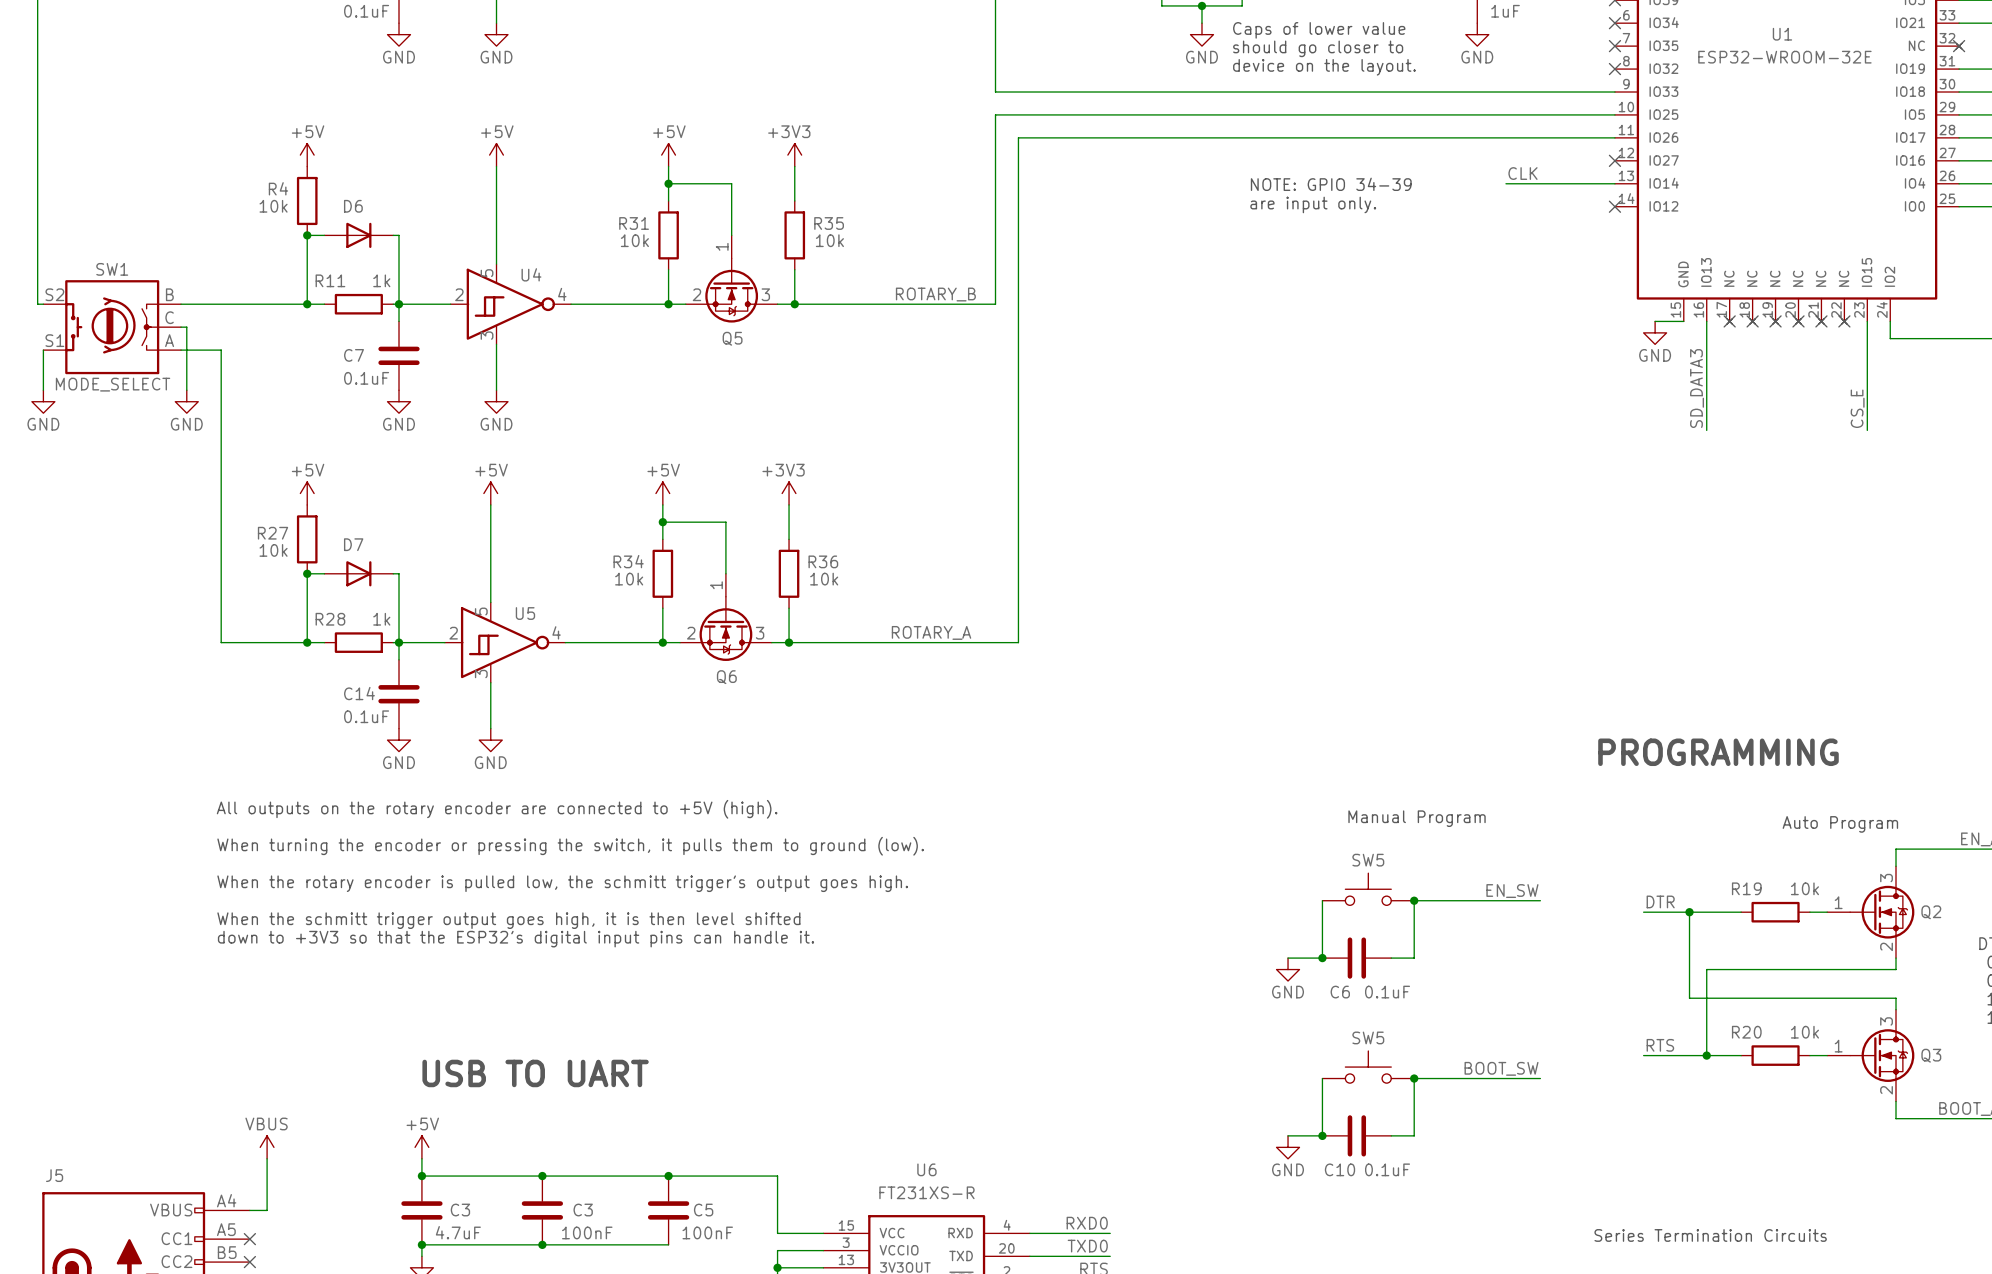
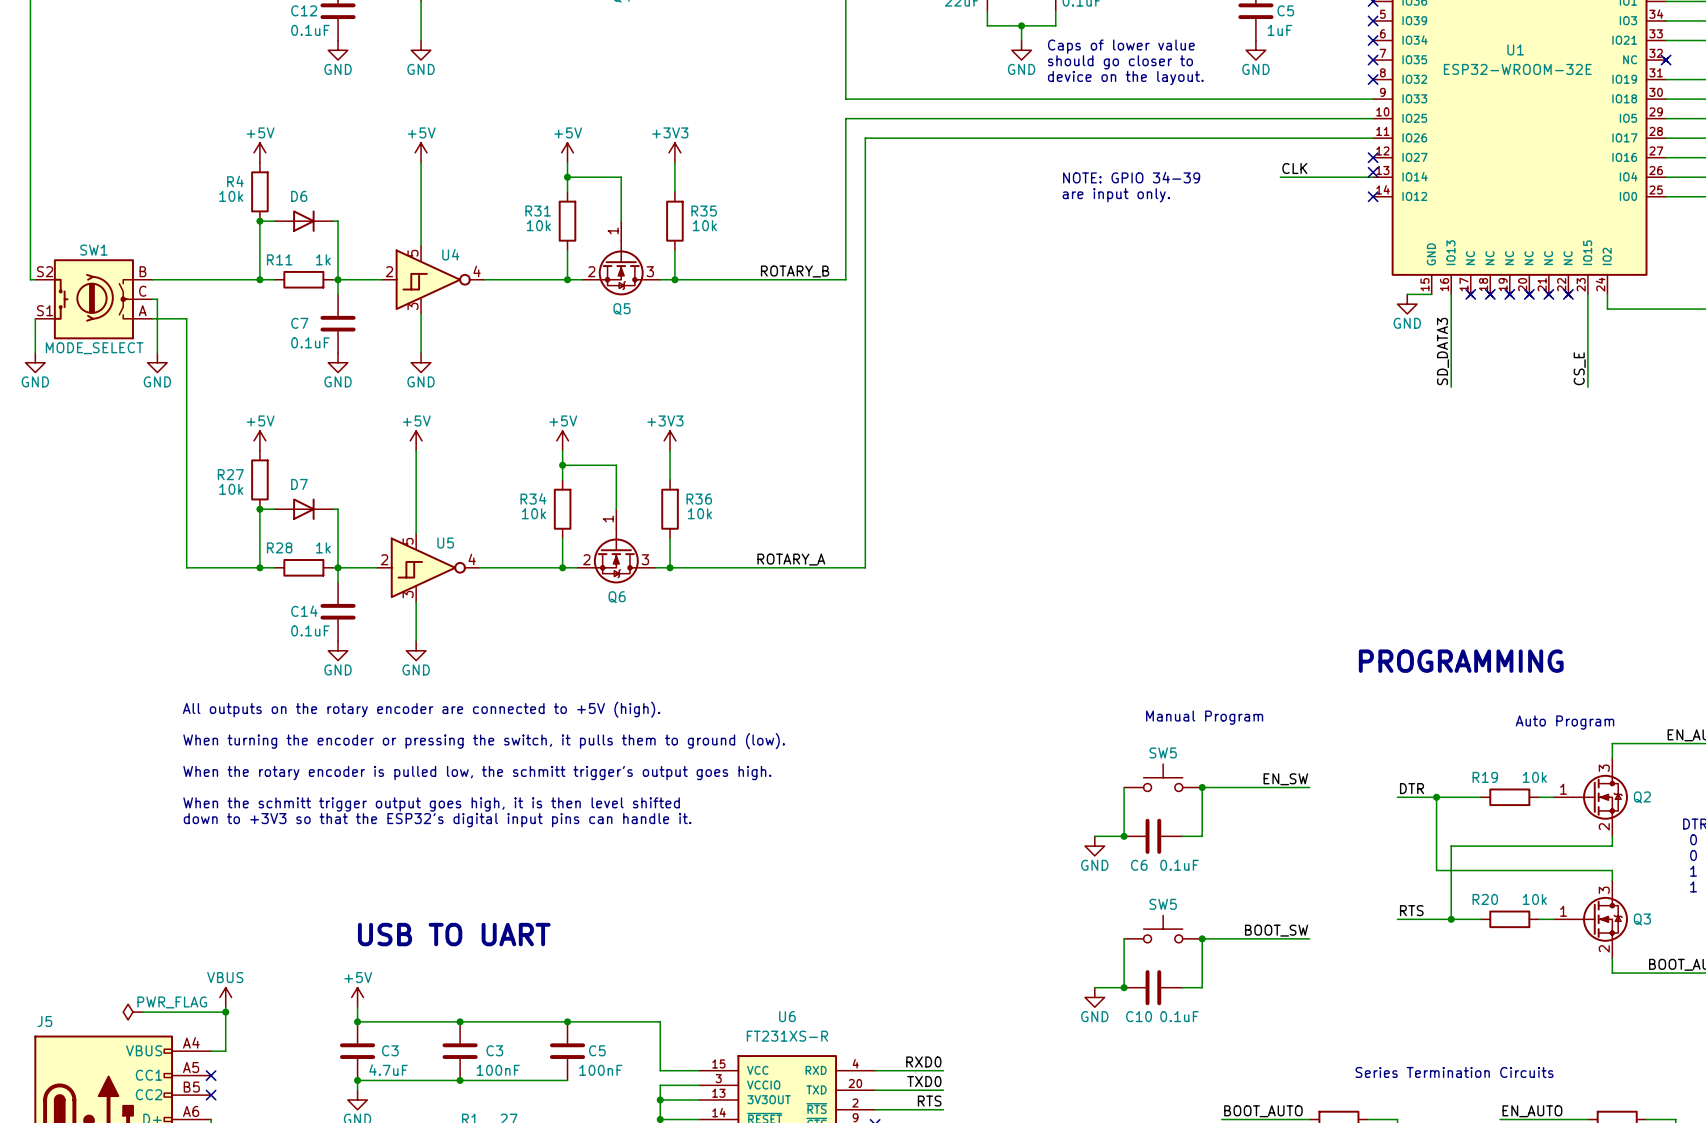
no-connect mark: none -> (1373, 172)
power symbol: none -> PWR_FLAG (132, 1012)
wire: none -> (142, 1012) (225, 1012)
junction: none -> (225, 1012)

